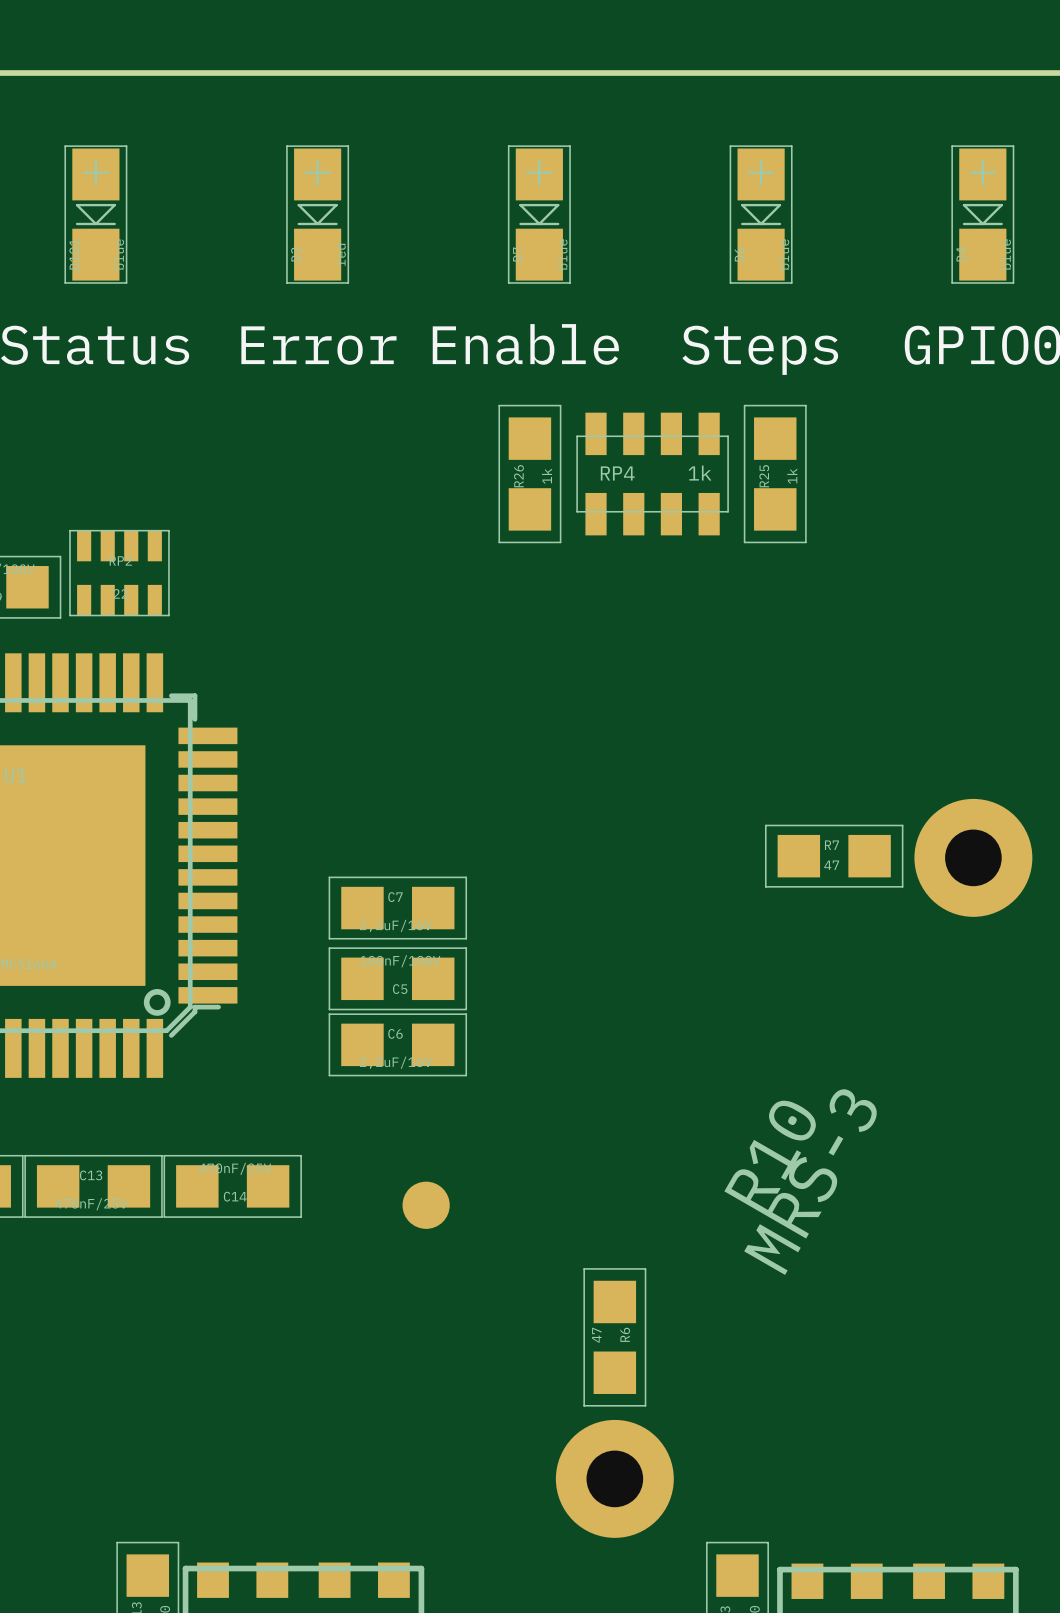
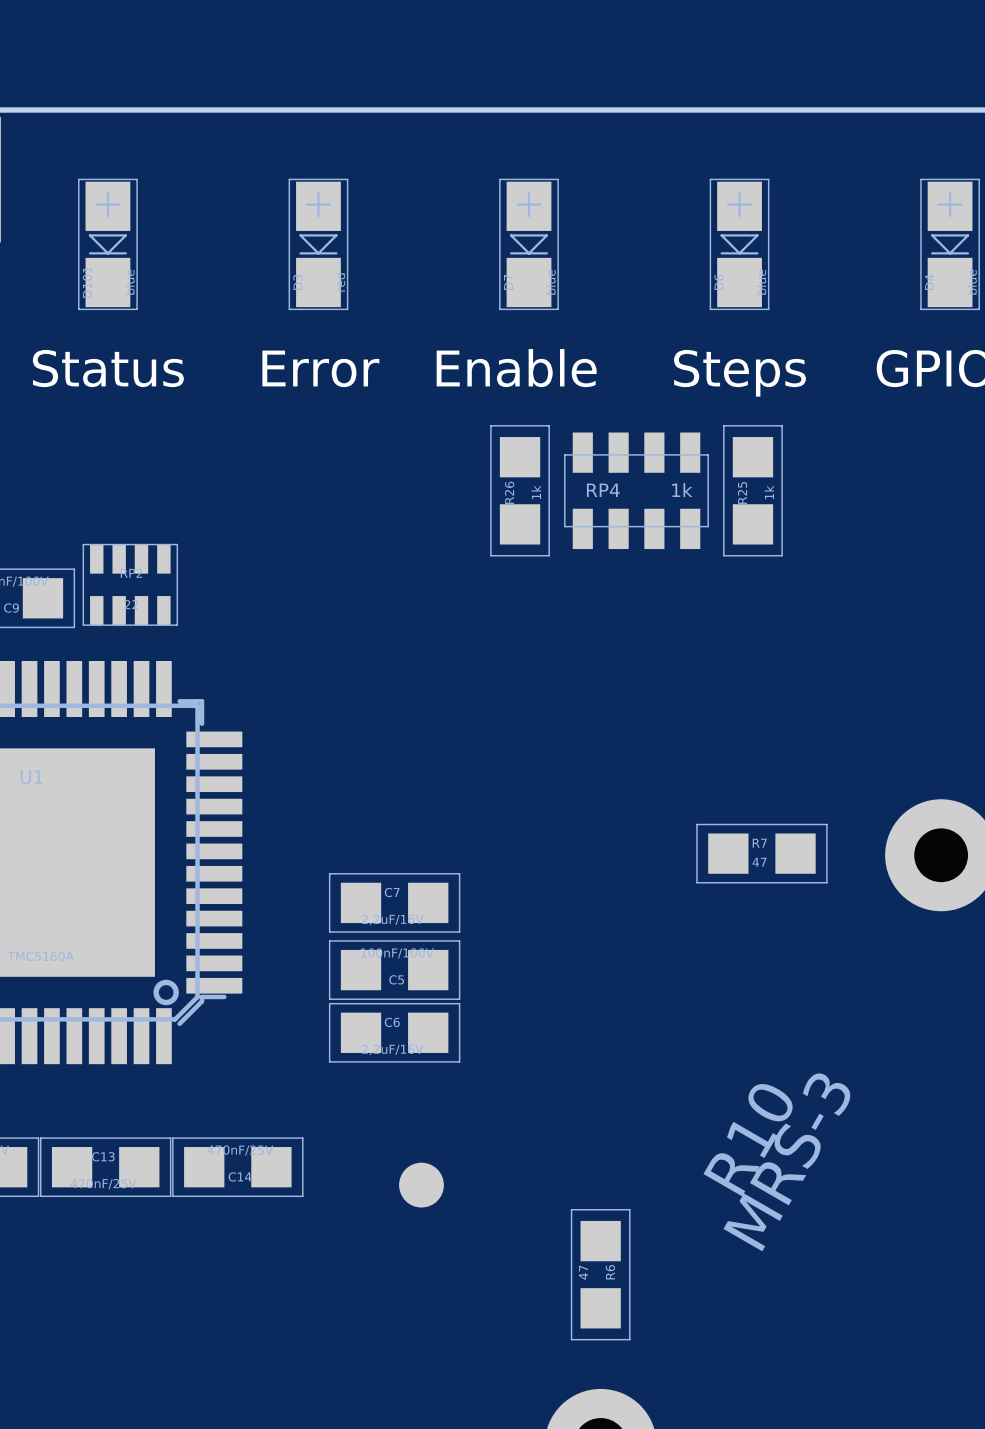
R7 position: (834, 856) -> (761, 853)
R6 position: (614, 1337) -> (600, 1274)

